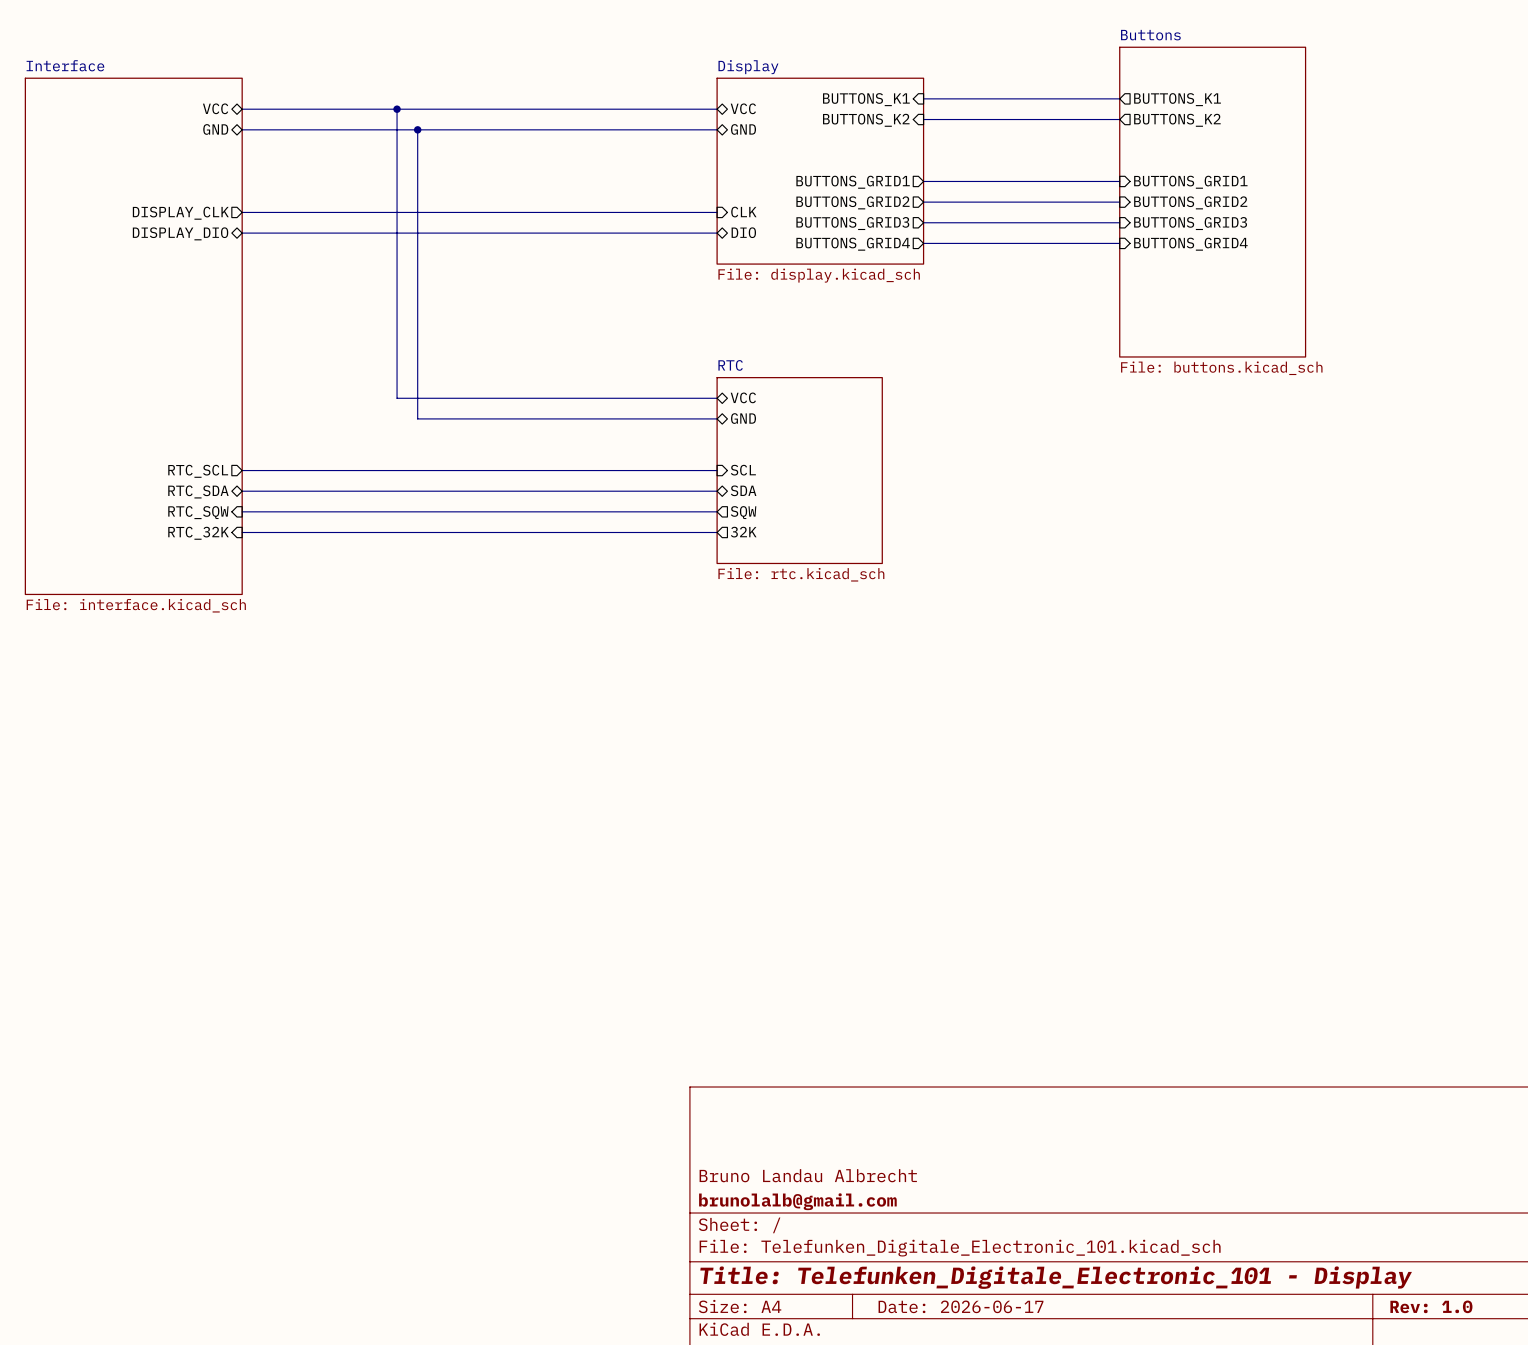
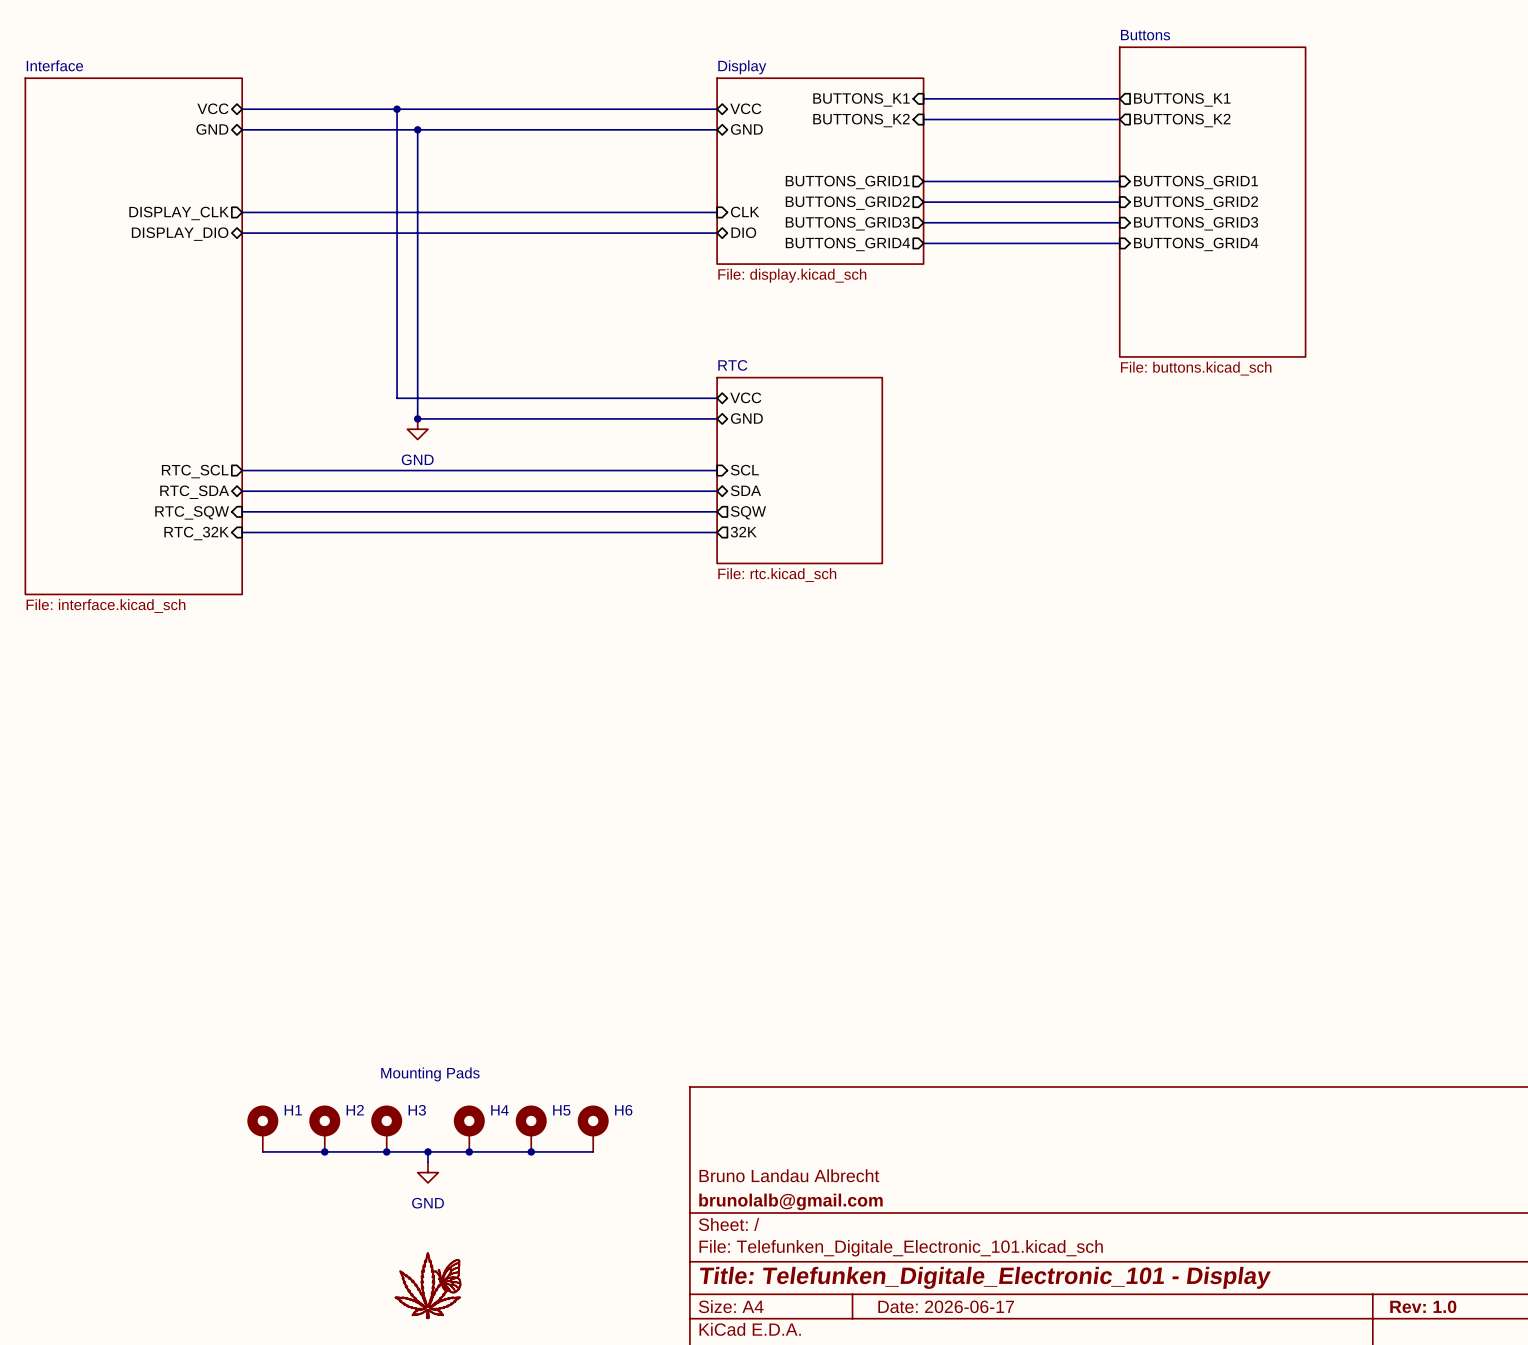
junction: none -> (417, 418)
power symbol: none -> GND (417, 429)
text: none -> Mounting Pads (430, 1074)
H1: none -> (262, 1128)
H2: none -> (324, 1128)
H3: none -> (386, 1128)
H4: none -> (469, 1128)
H5: none -> (531, 1128)
H6: none -> (593, 1128)
wire: none -> (262, 1151) (593, 1151)
junction: none -> (324, 1151)
junction: none -> (386, 1151)
wire: none -> (428, 1151) (428, 1162)
junction: none -> (428, 1151)
junction: none -> (469, 1151)
junction: none -> (531, 1151)
power symbol: none -> GND (428, 1172)
part: none -> (428, 1285)

